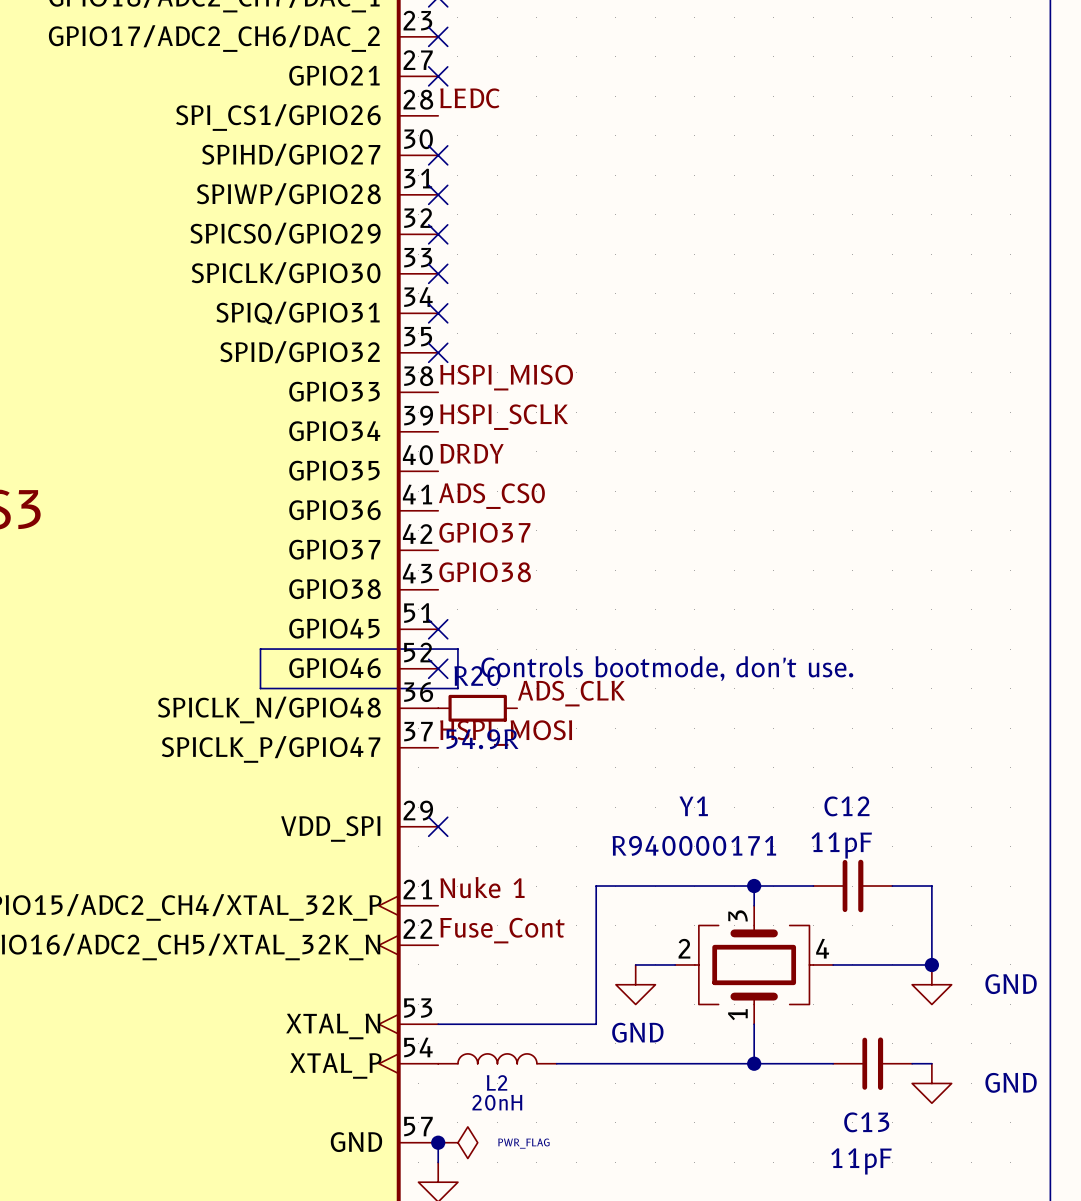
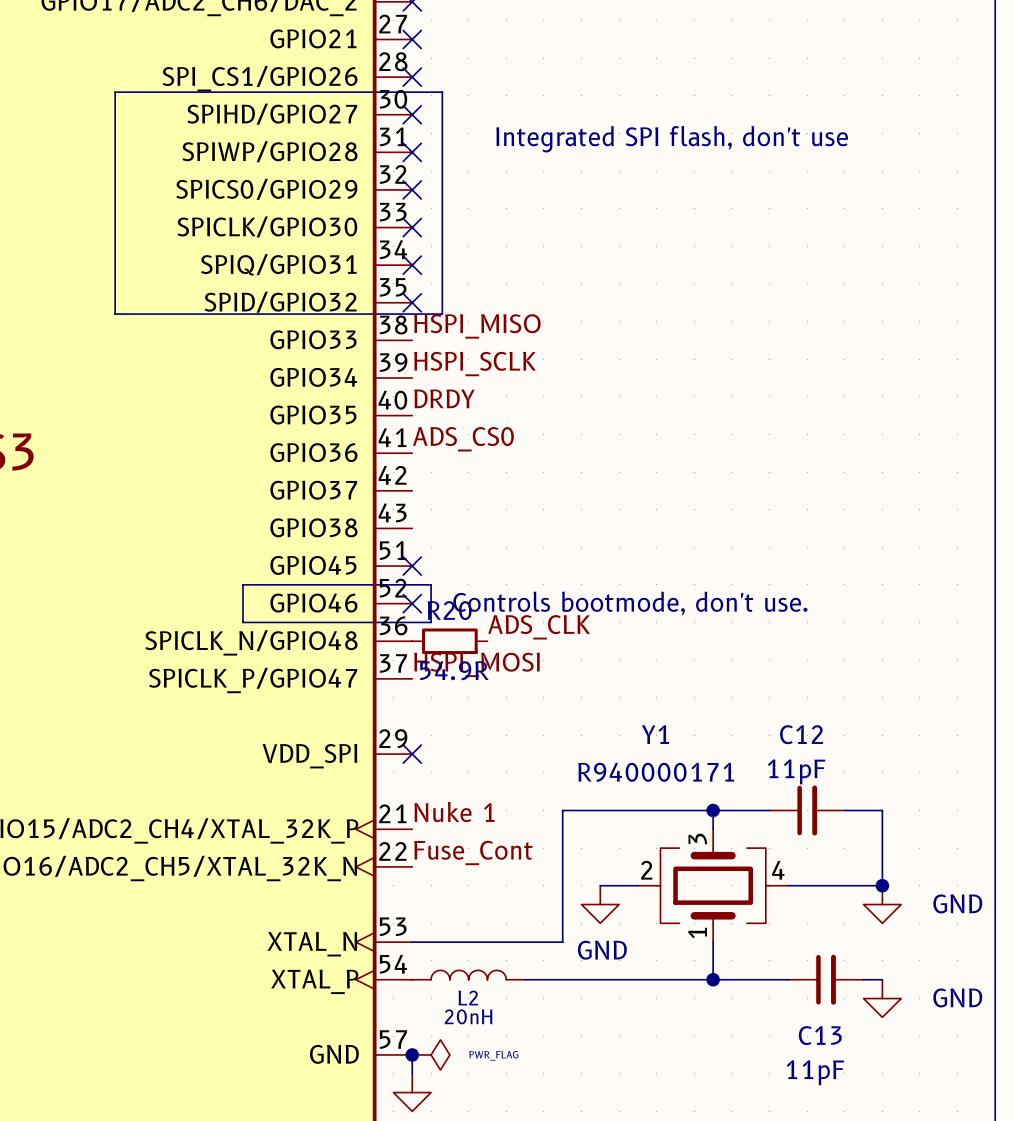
label: LEDC (469, 98) -> none
no-connect mark: none -> (412, 77)
line: none -> (115, 92) (442, 92) (442, 314) (115, 314) (115, 92)
text: none -> Integrated SPI flash, don't use (672, 139)
label: GPIO37 (484, 532) -> none
label: GPIO38 (485, 572) -> none

